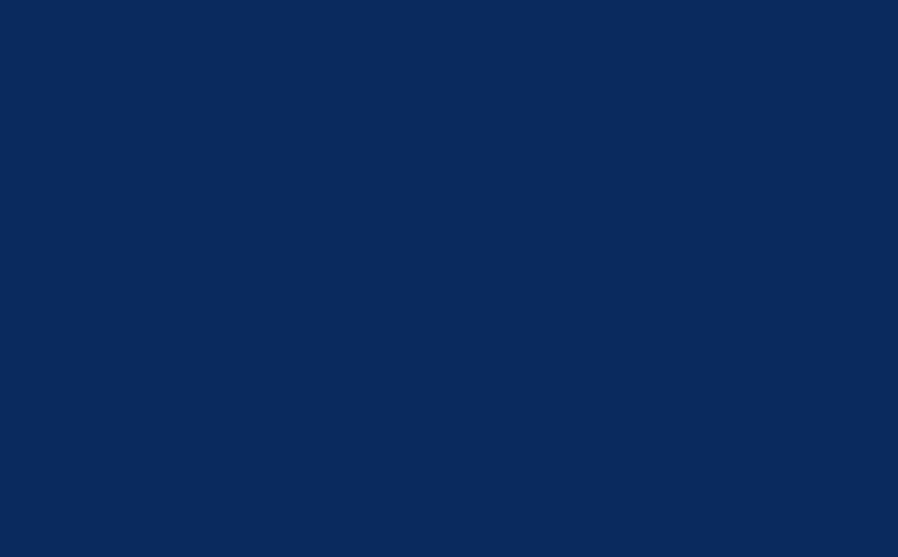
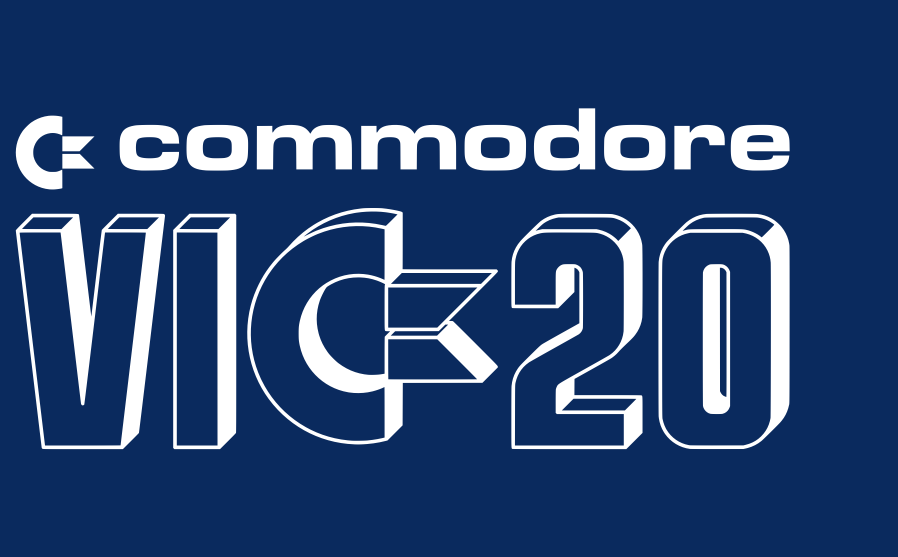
drawing: none -> [15, 108, 790, 450]

